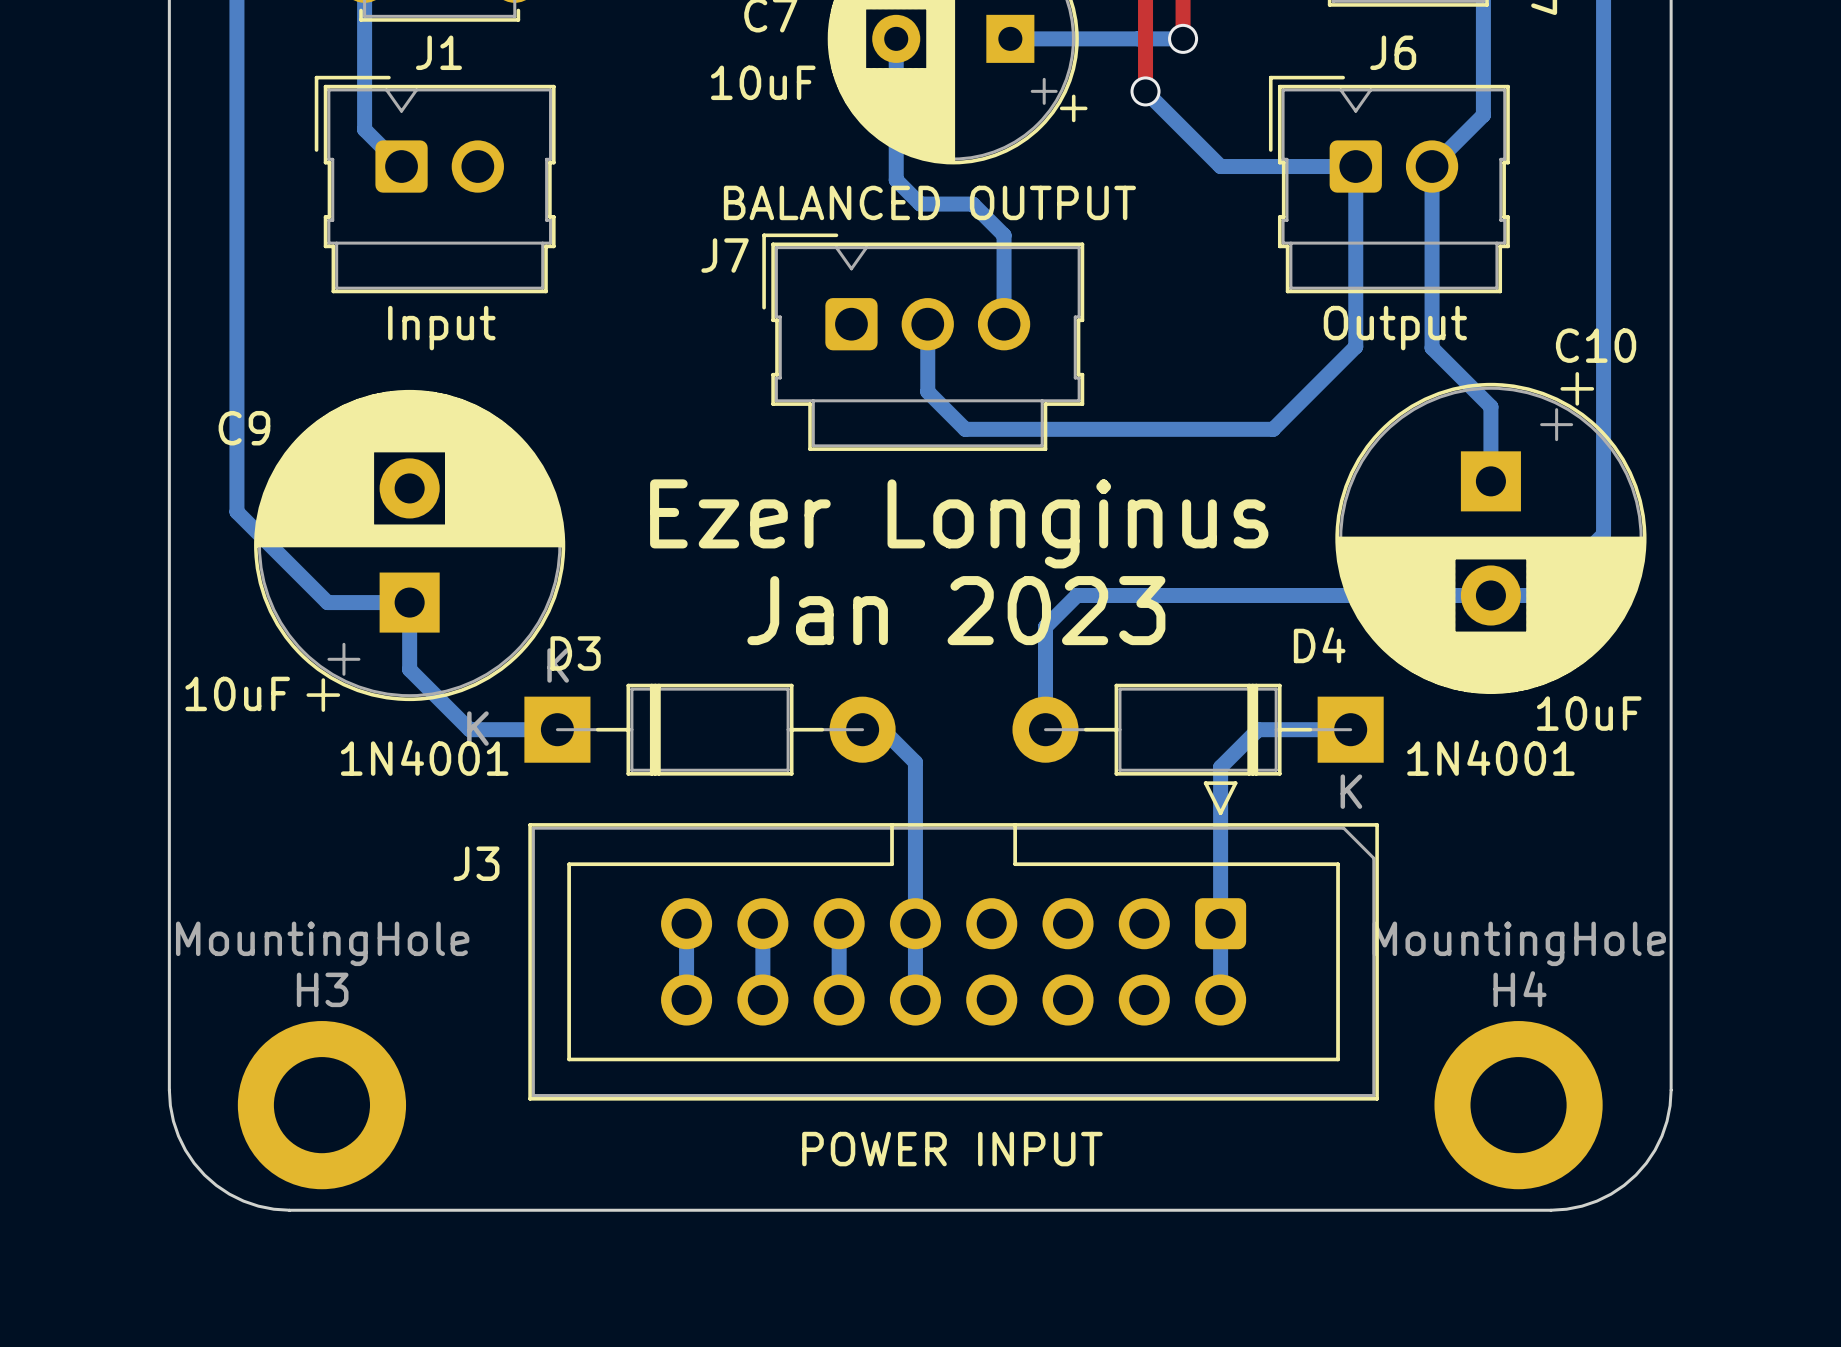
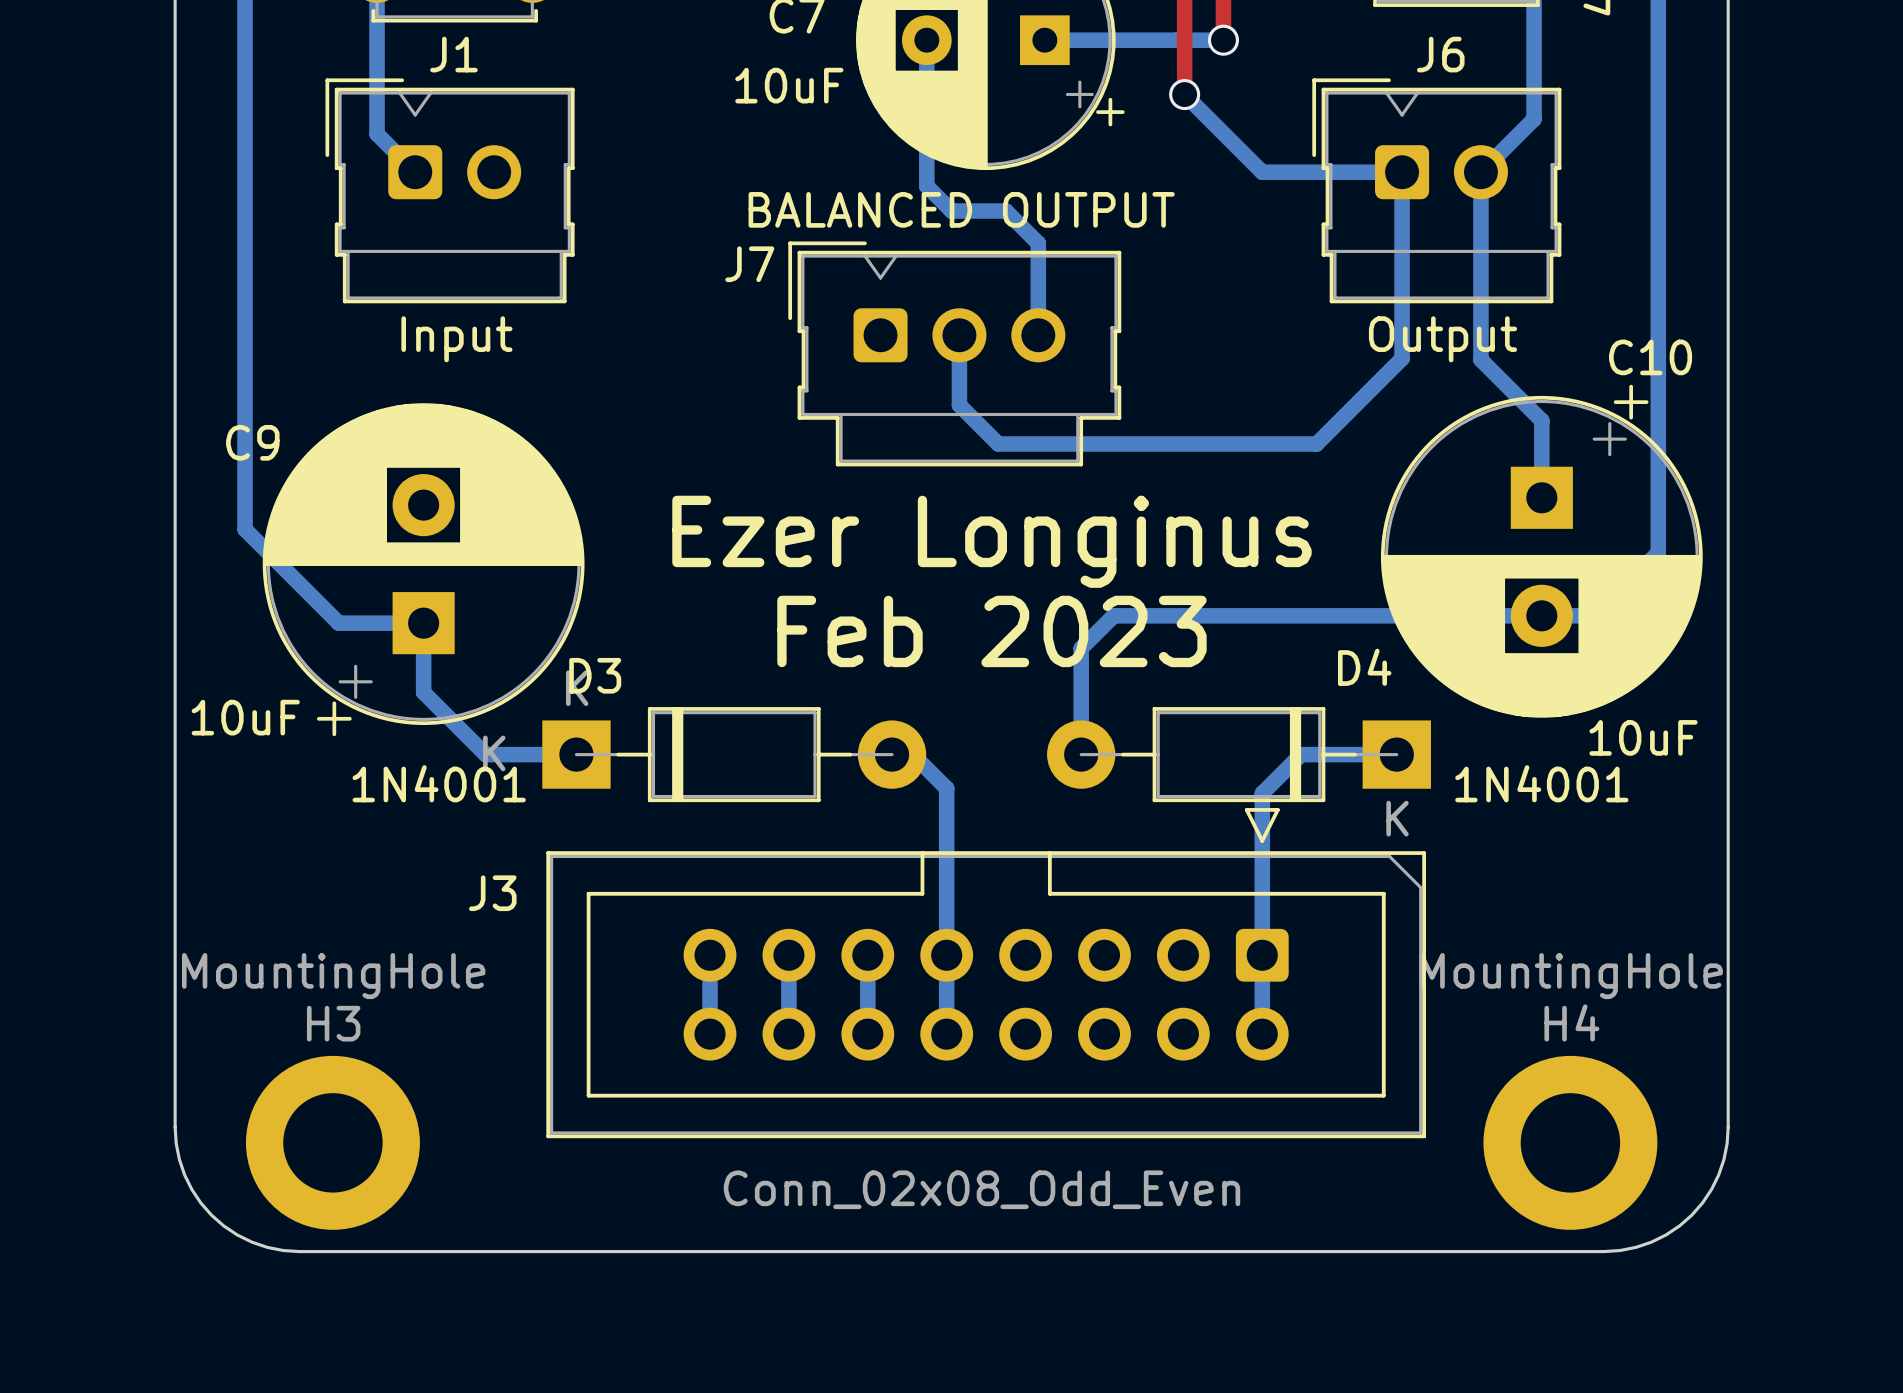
text: Jan 2023 (956, 610) -> Feb 2023 (991, 631)
J3 value: POWER INPUT (952, 1149) -> Conn_02x08_Odd_Even (981, 1189)

